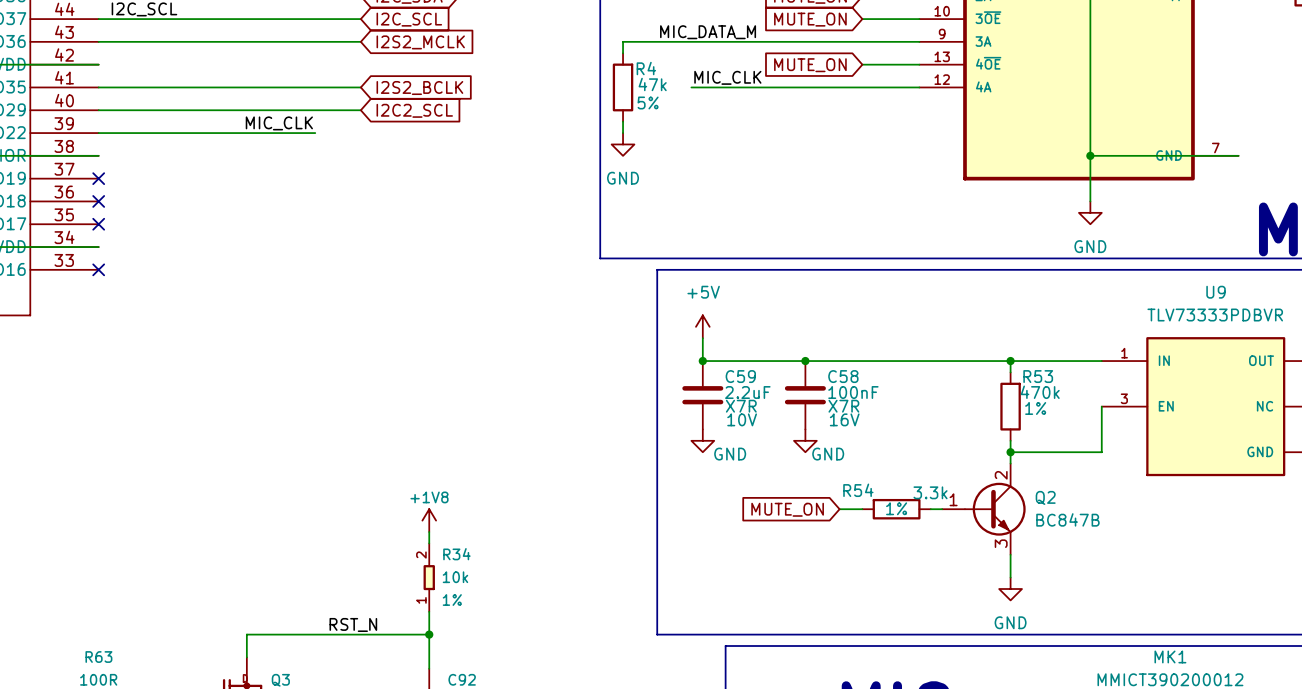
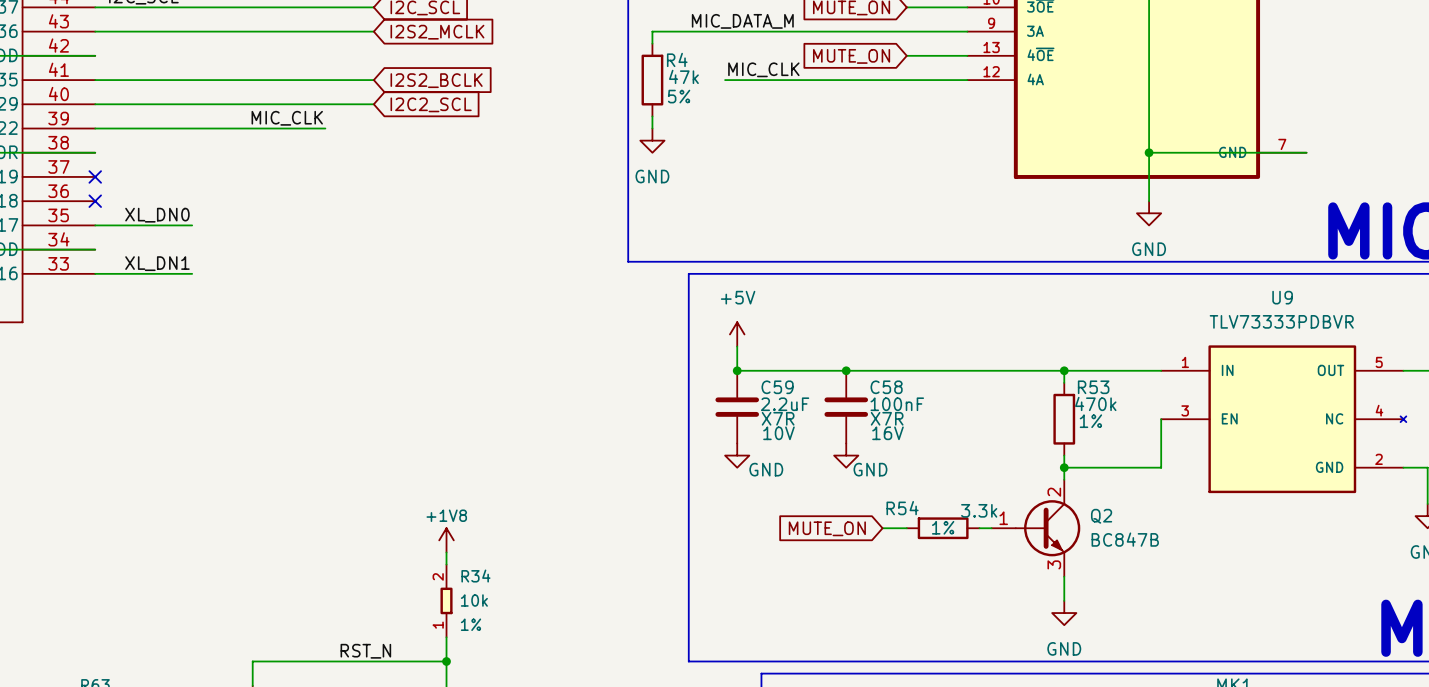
label: none -> XL_DN0 (157, 215)
wire: none -> (95, 225) (192, 225)
no-connect mark: (98, 224) -> none
label: none -> XL_DN1 (157, 263)
wire: none -> (95, 273) (192, 273)
no-connect mark: (98, 269) -> none

